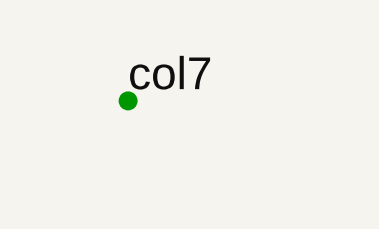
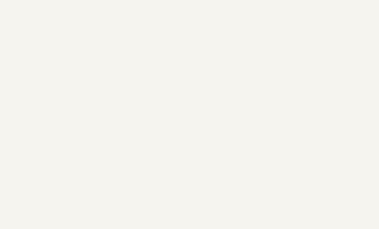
label: col7 (170, 72) -> none
junction: (128, 100) -> none

